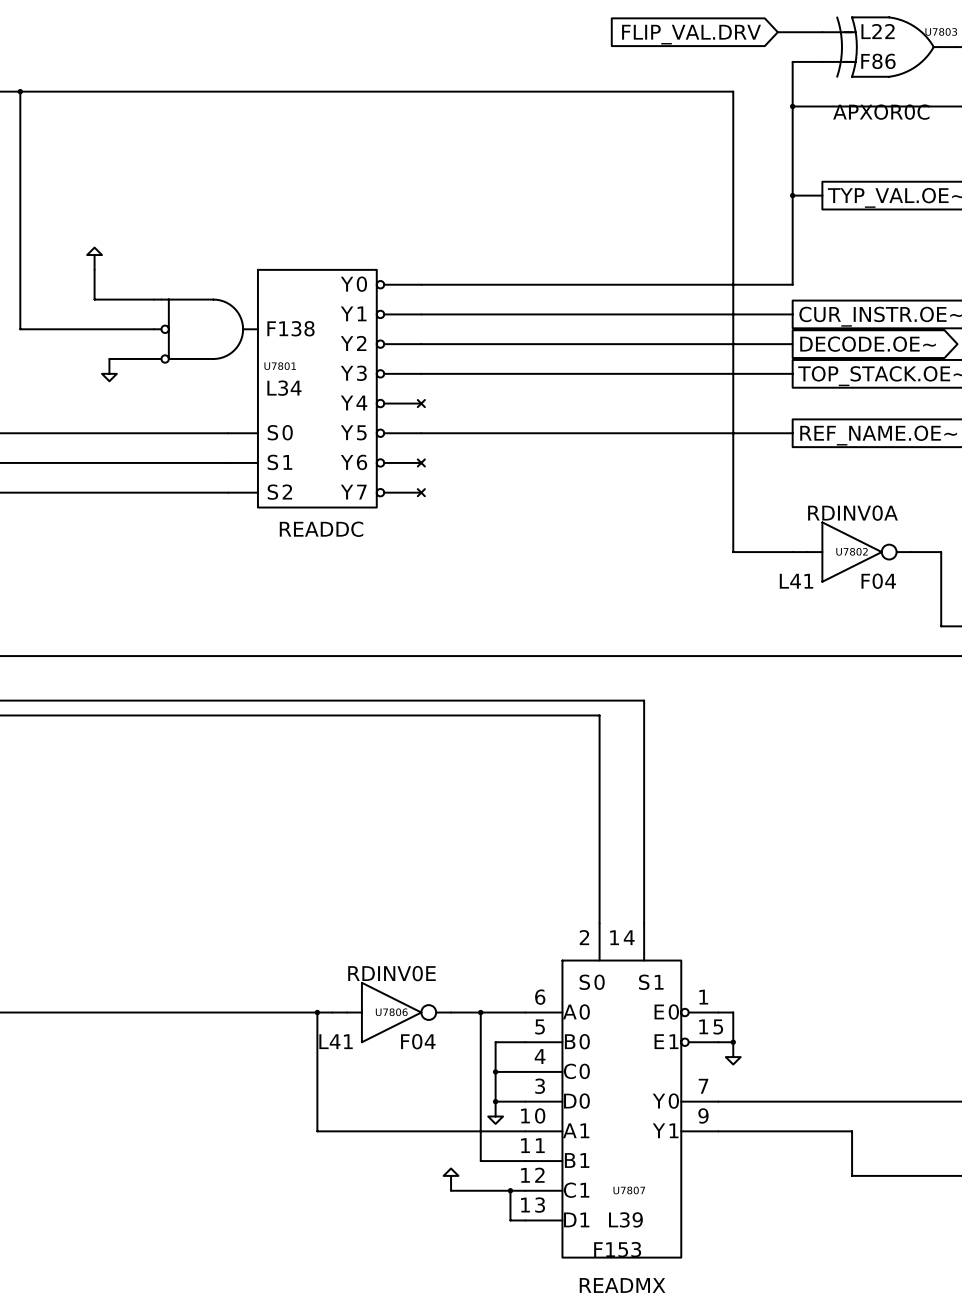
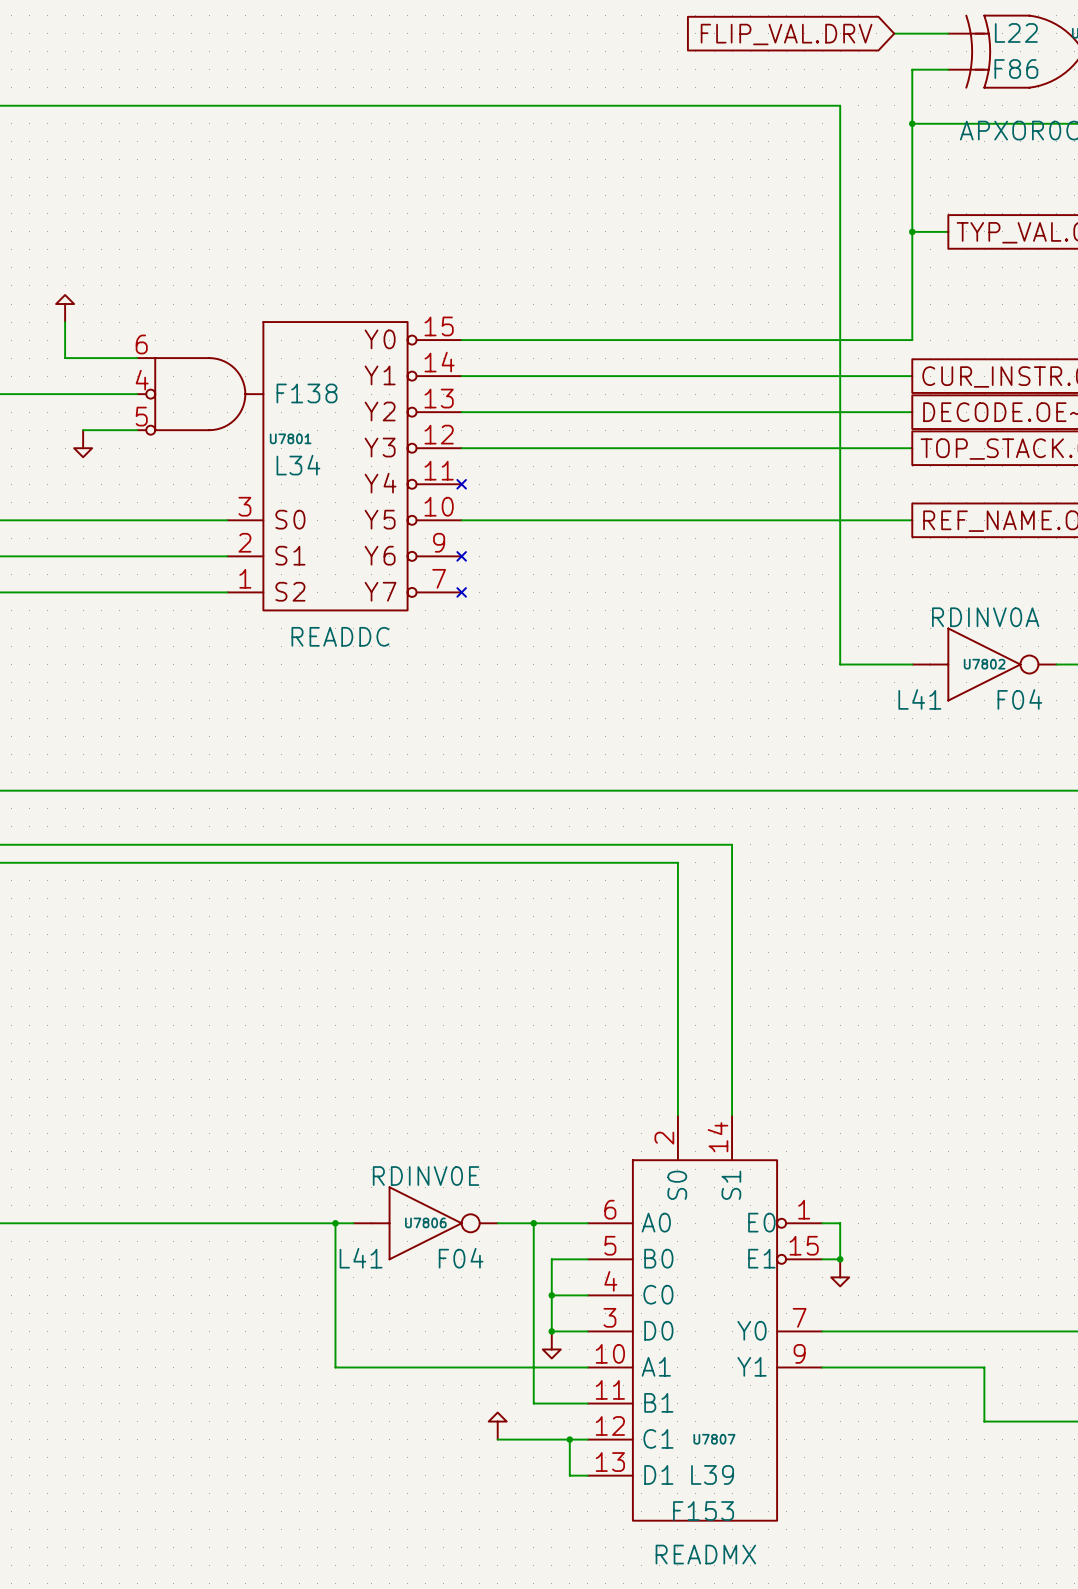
U7801 symbol: [153, 269, 422, 508] -> [137, 321, 462, 611]
U7807 symbol: [525, 923, 719, 1258] -> [587, 1115, 823, 1521]

